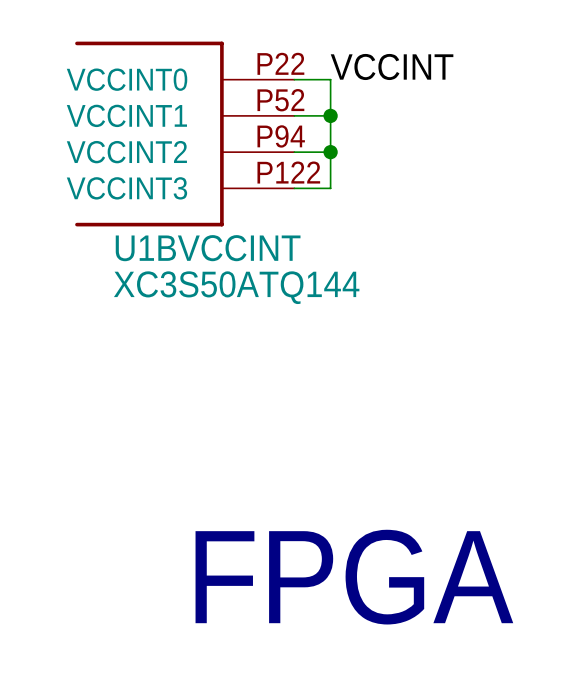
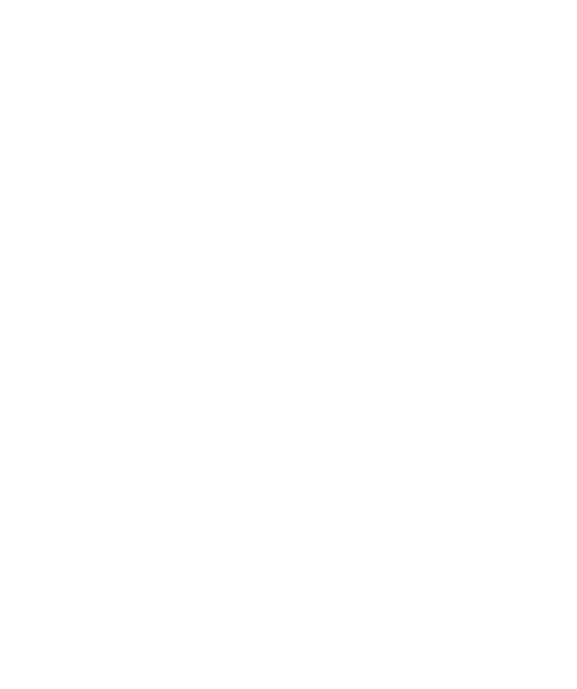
label: VCCINT (392, 66) -> none
wire: (294, 79) (330, 79) (330, 188) (294, 188) -> none
wire: (294, 115) (330, 115) -> none
junction: (330, 115) -> none
U1BVCCINT: XC3S50ATQ144 (184, 134) -> none
wire: (294, 152) (330, 152) -> none
junction: (330, 152) -> none
text: FPGA (354, 577) -> none

